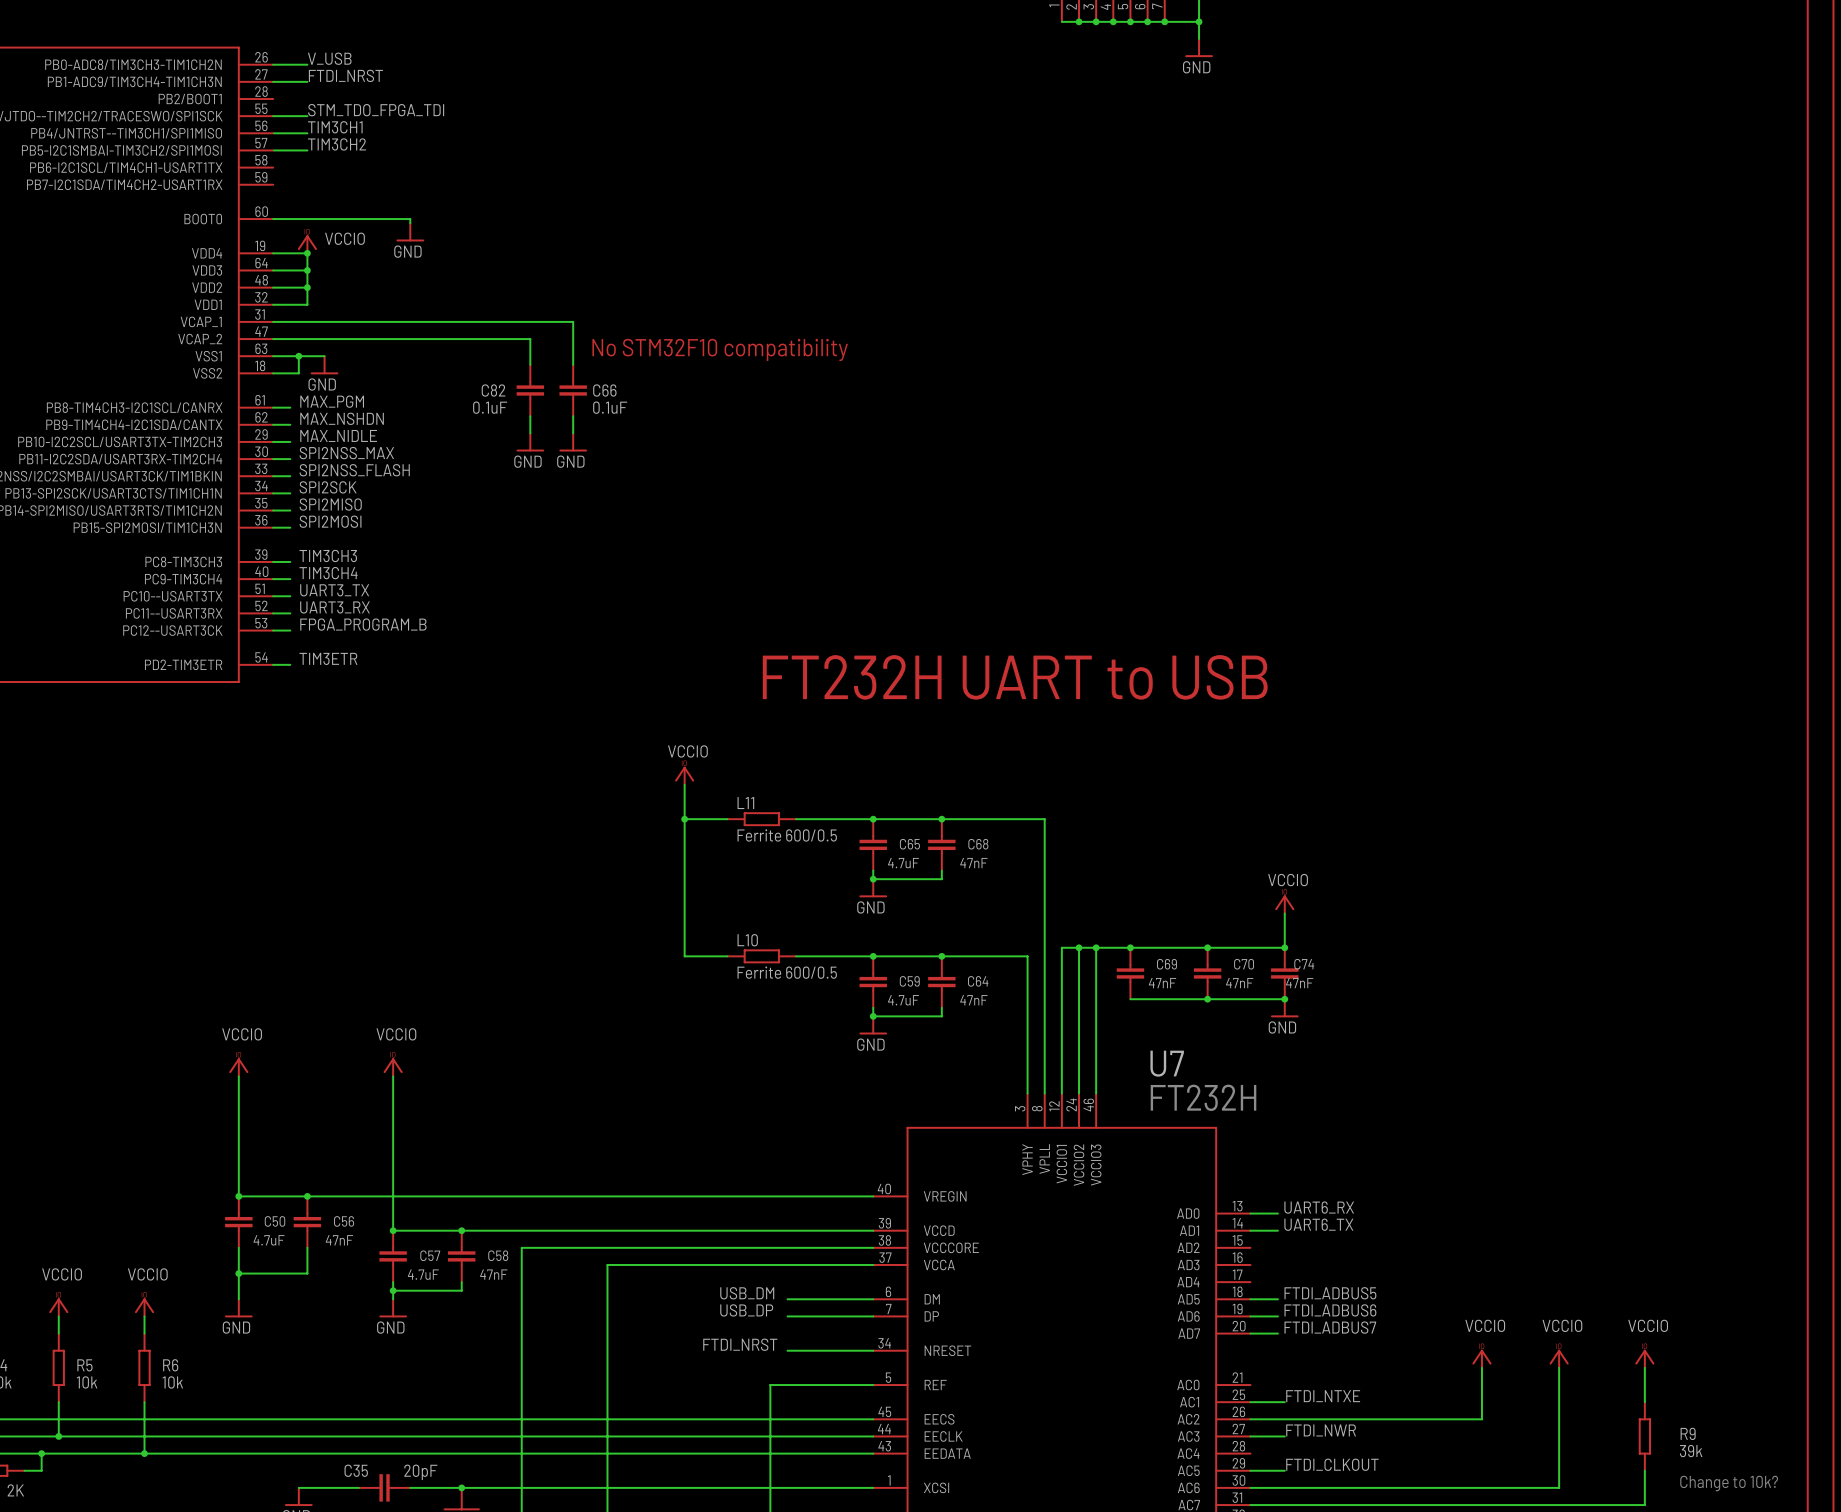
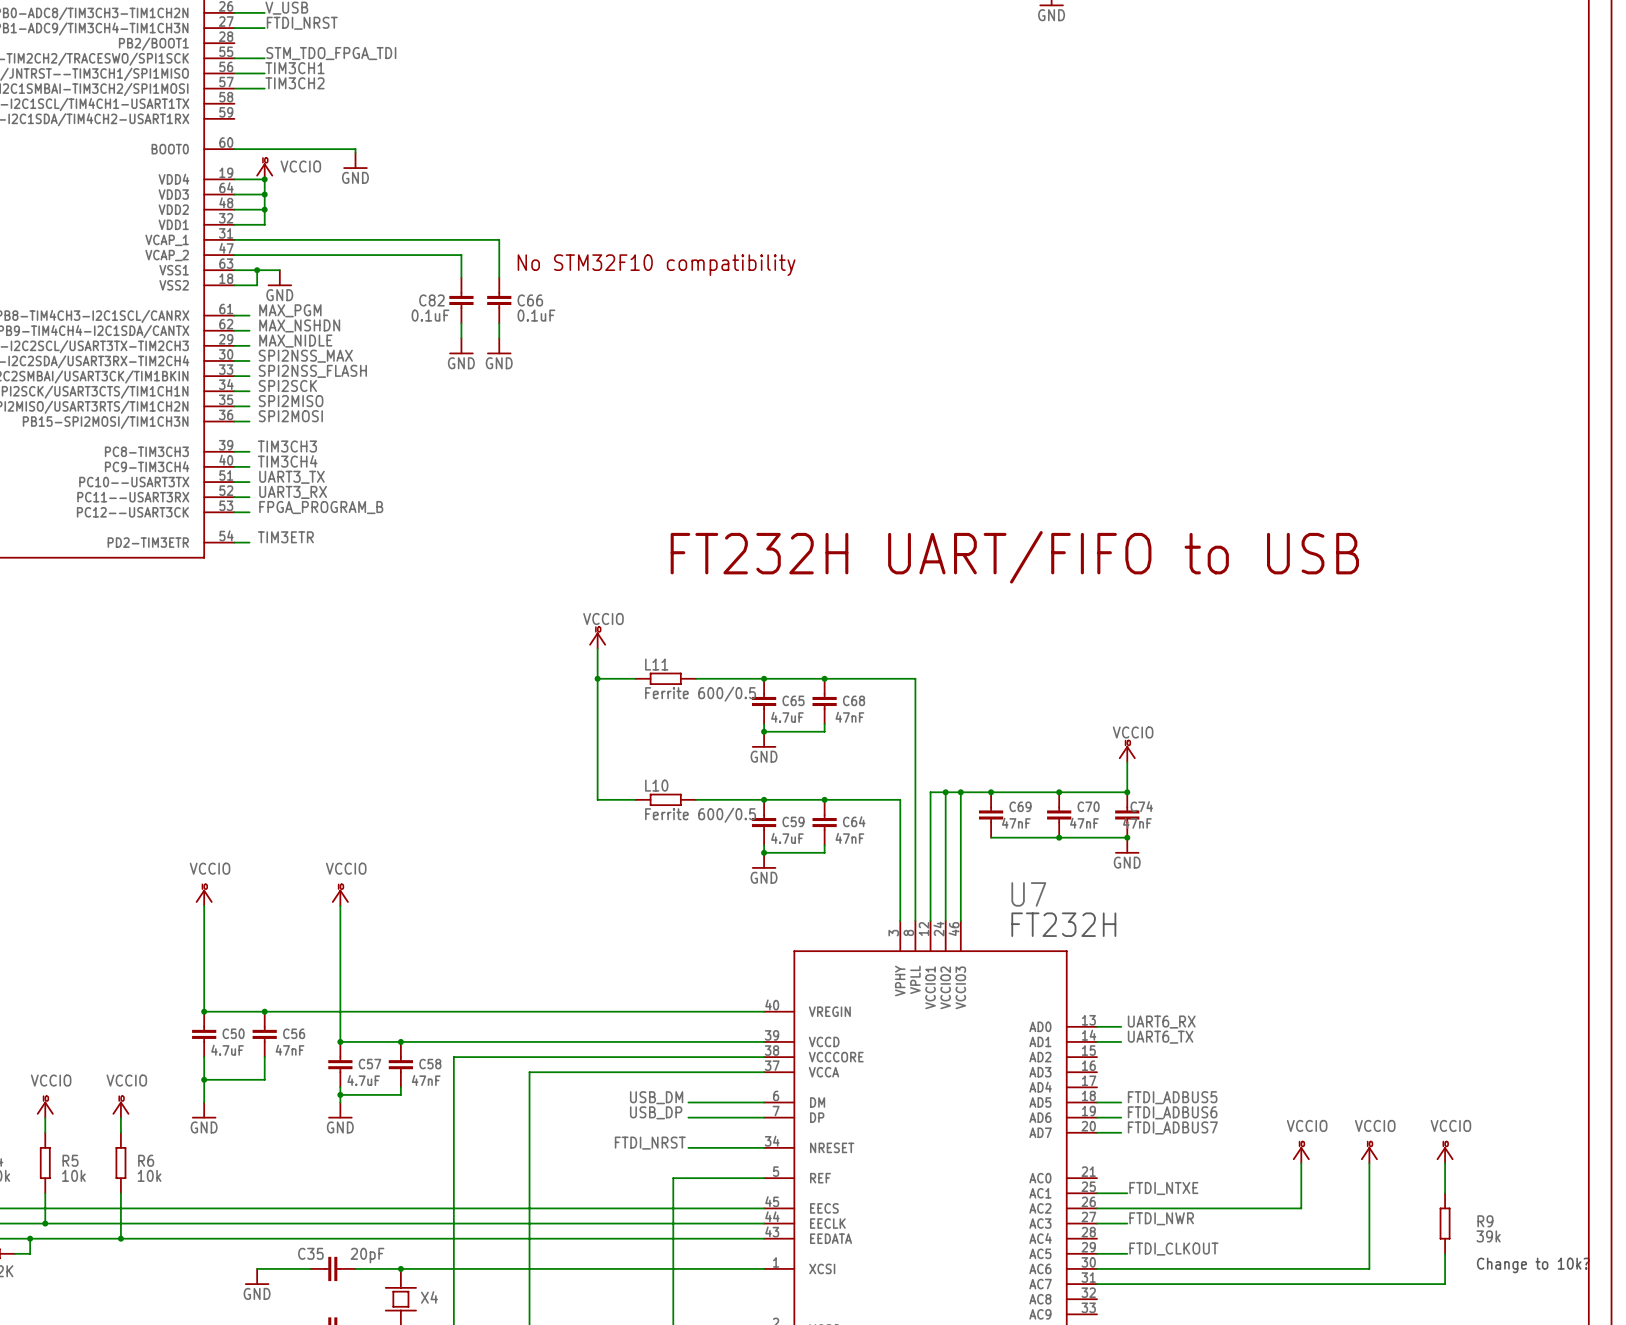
text: FT232H UART to USB (1015, 677) -> FT232H UART/FIFO to USB (1014, 557)

